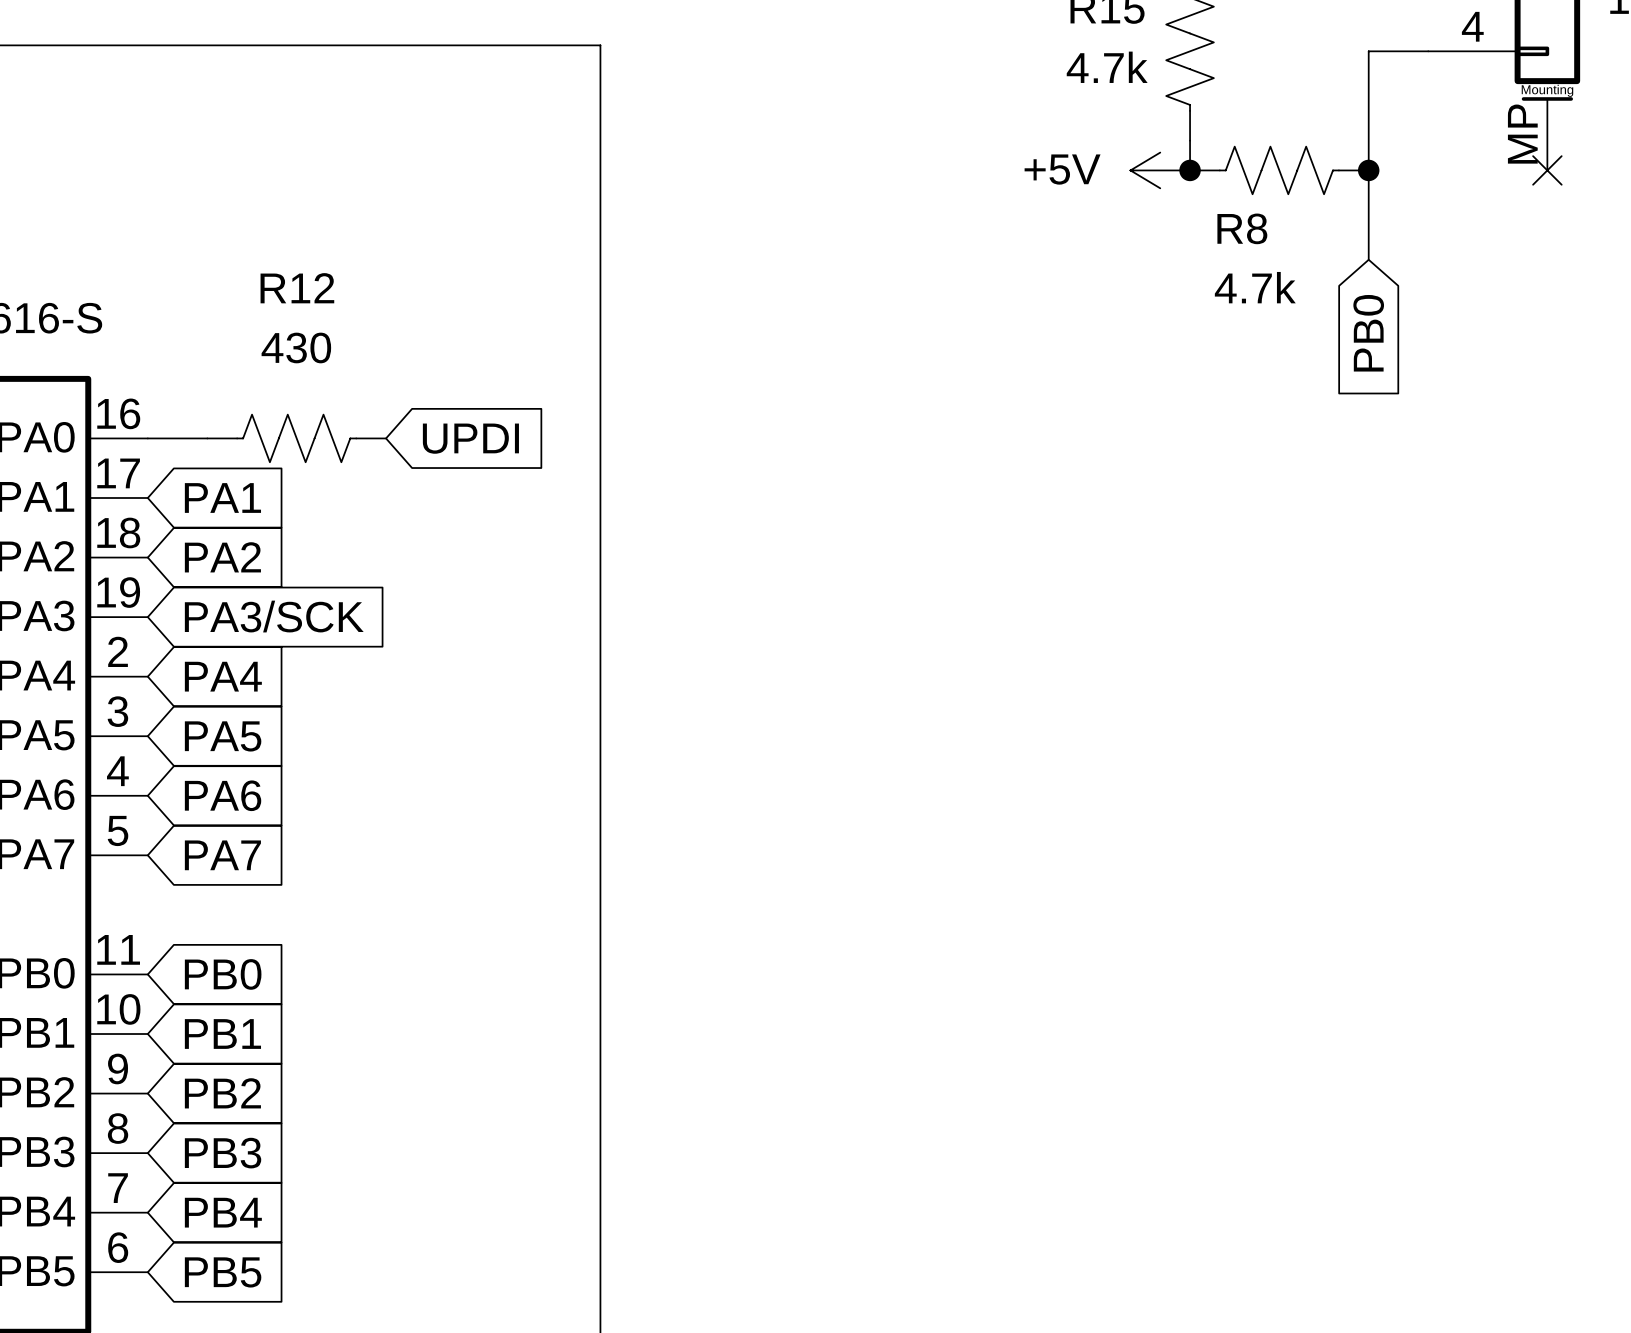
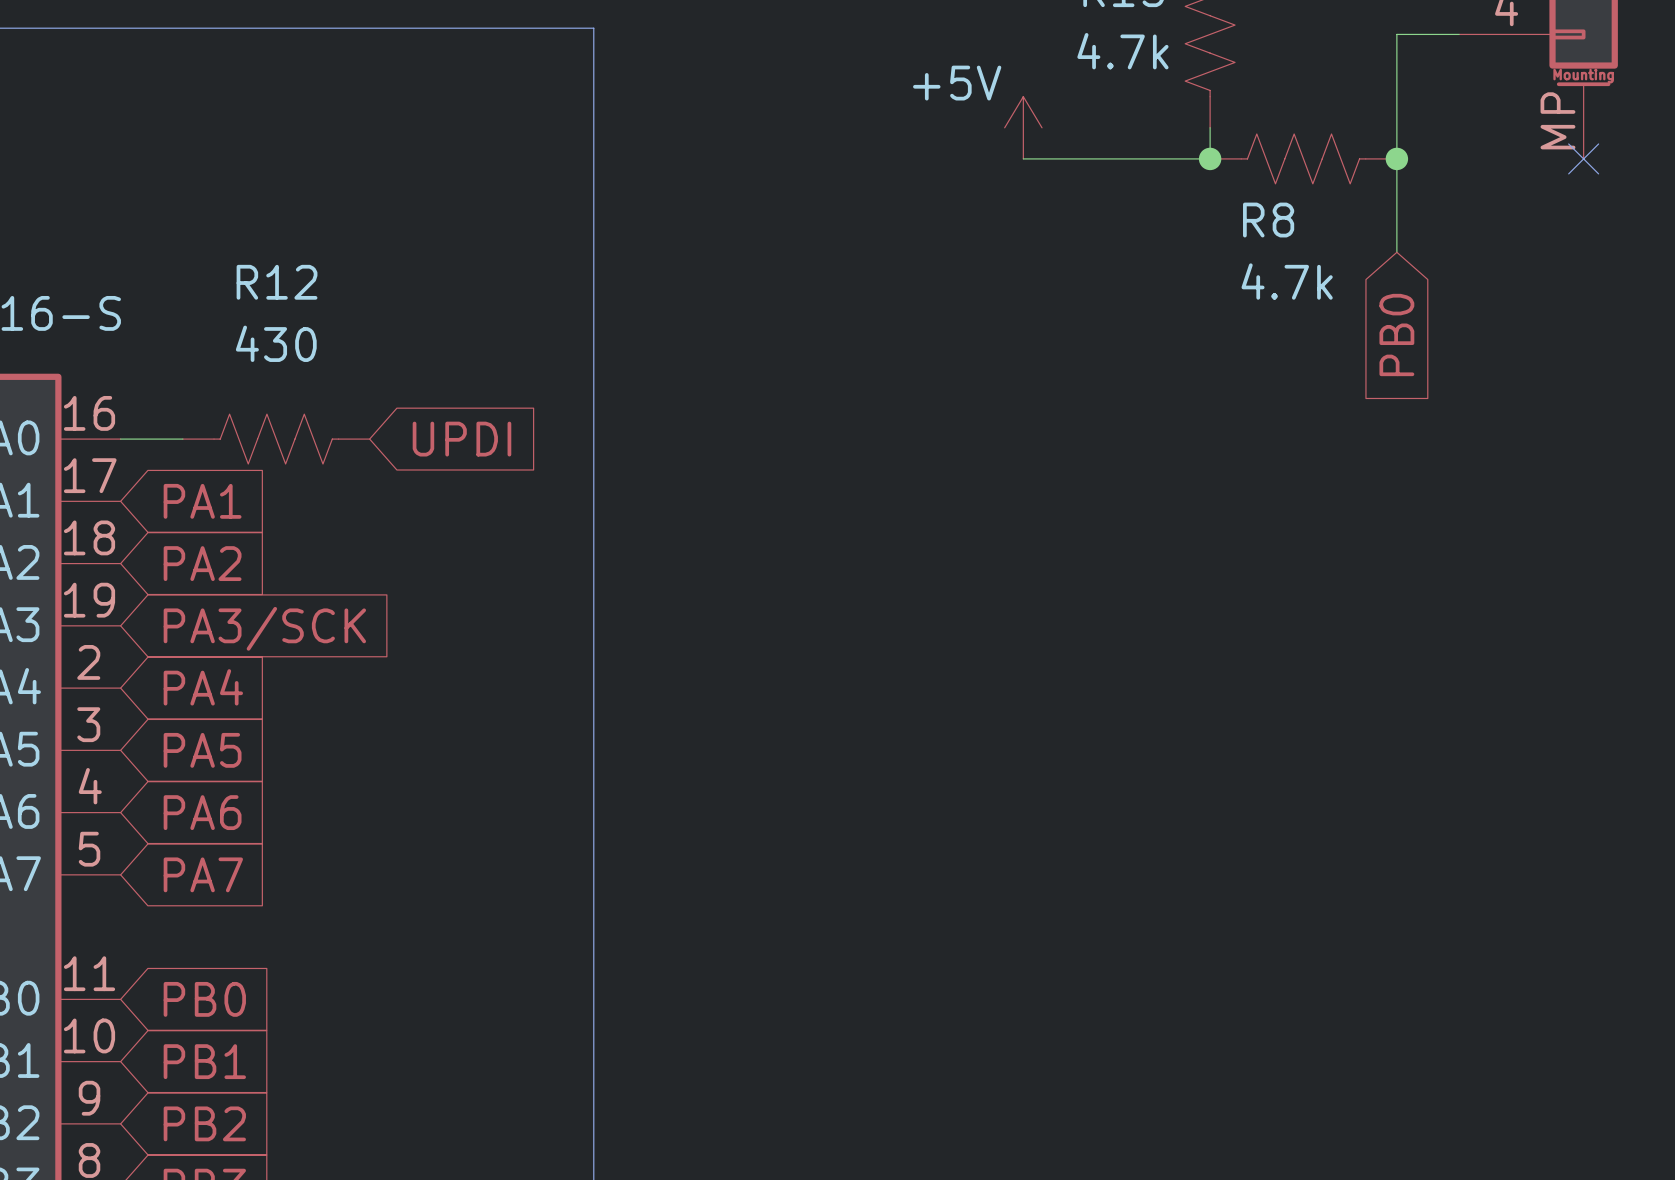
power symbol text position: +5V (1062, 169) -> +5V (957, 83)
wire: none -> (1023, 158) (1210, 158)
power symbol rotation: 0° (1160, 170) -> 90° clockwise (1023, 127)
power symbol position: +5V (1160, 170) -> +5V (1023, 127)

